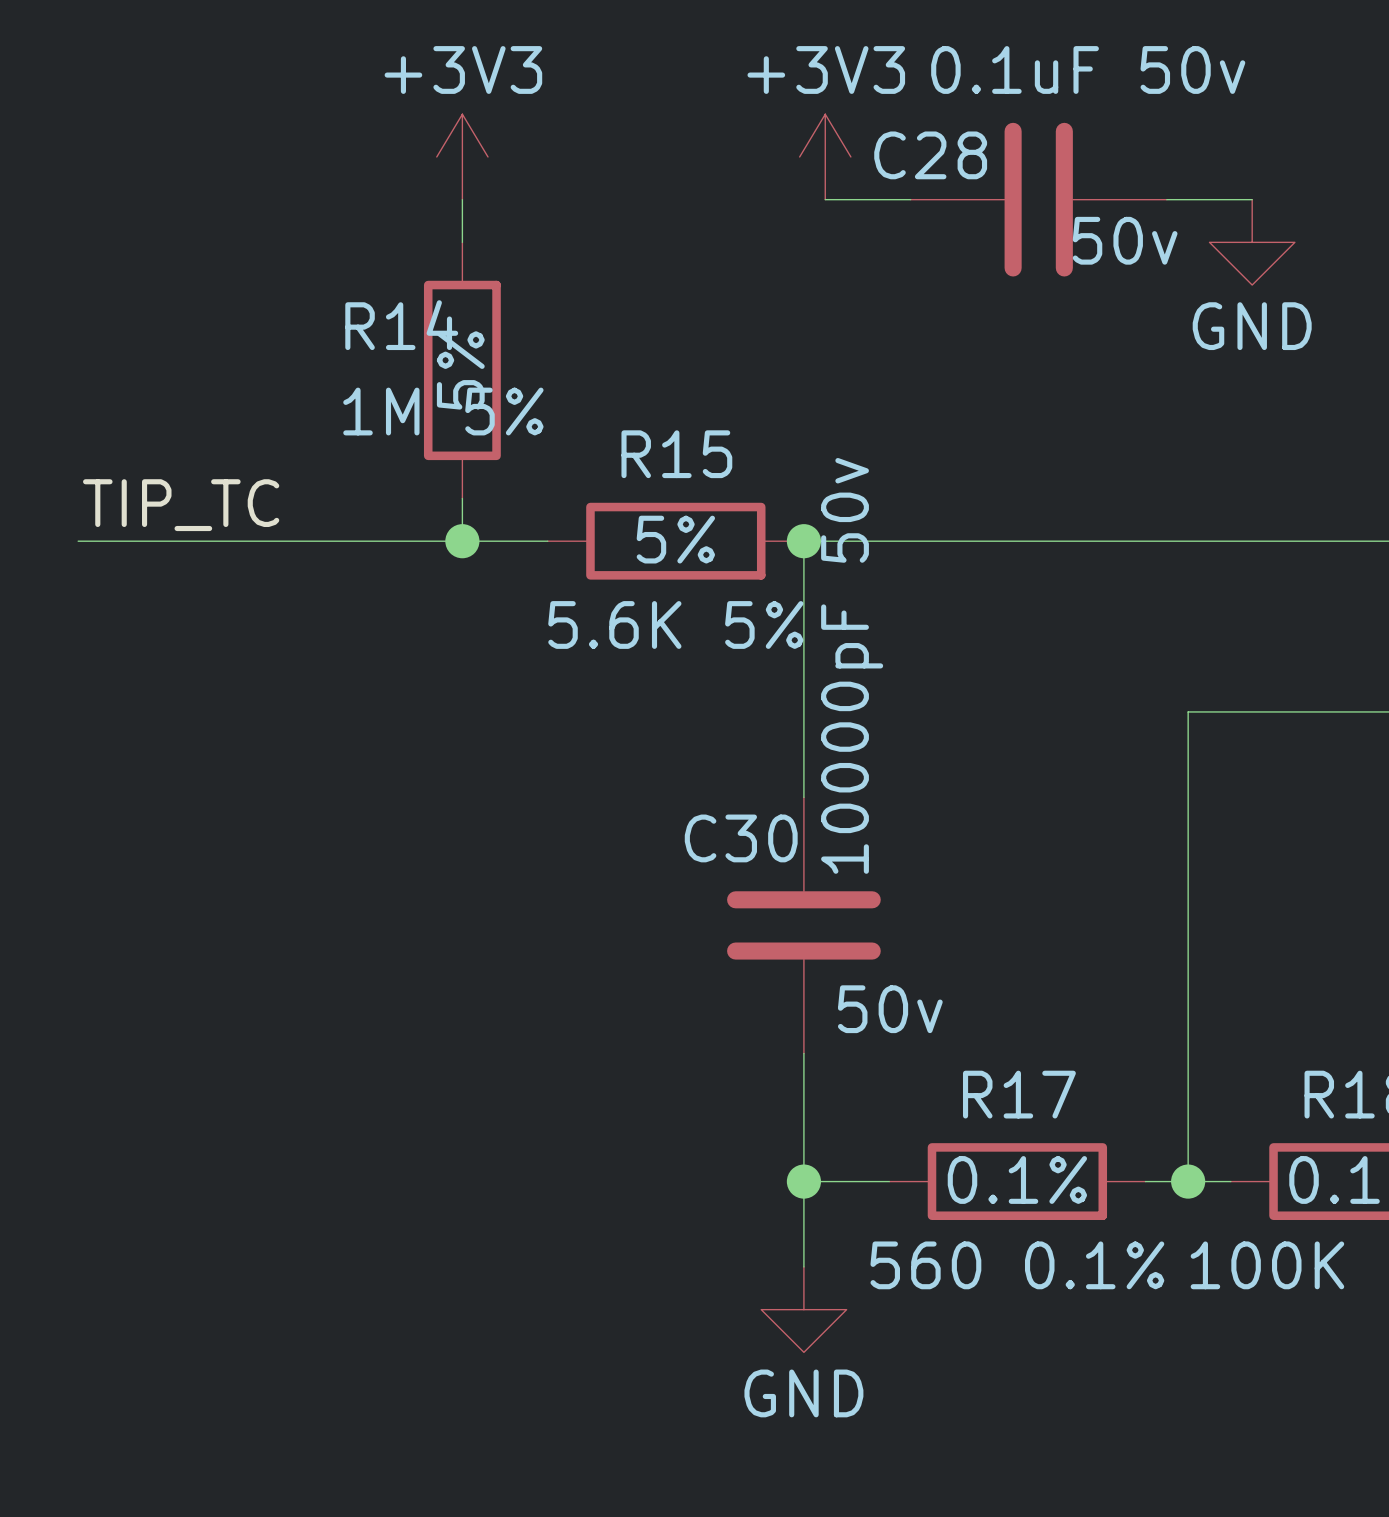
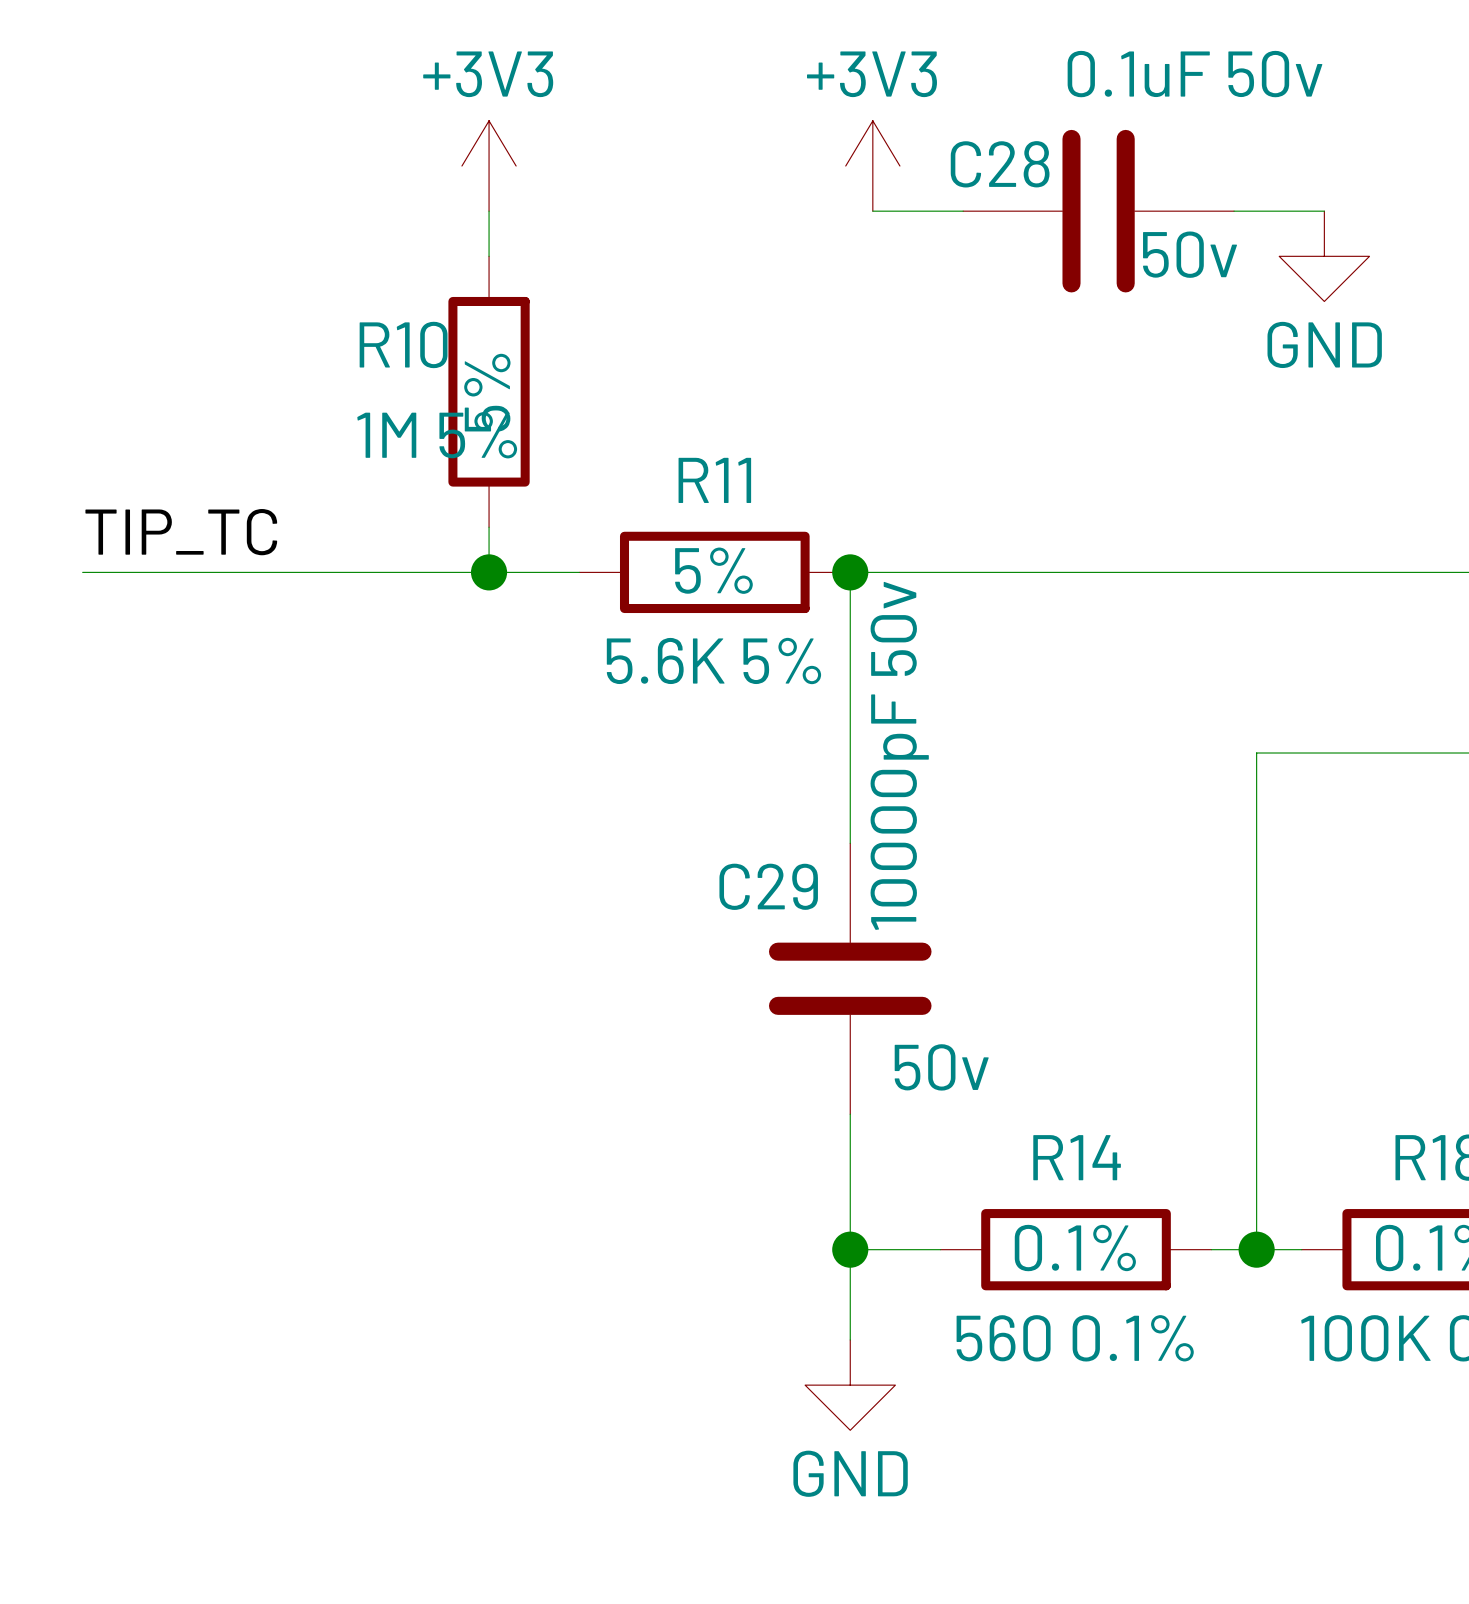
R14 name: R14 (401, 325) -> R10 (403, 344)
R15 name: R15 (676, 454) -> R11 (714, 480)
C30 name: C30 (741, 838) -> C29 (768, 886)
R17 name: R17 (1019, 1094) -> R14 (1077, 1157)

